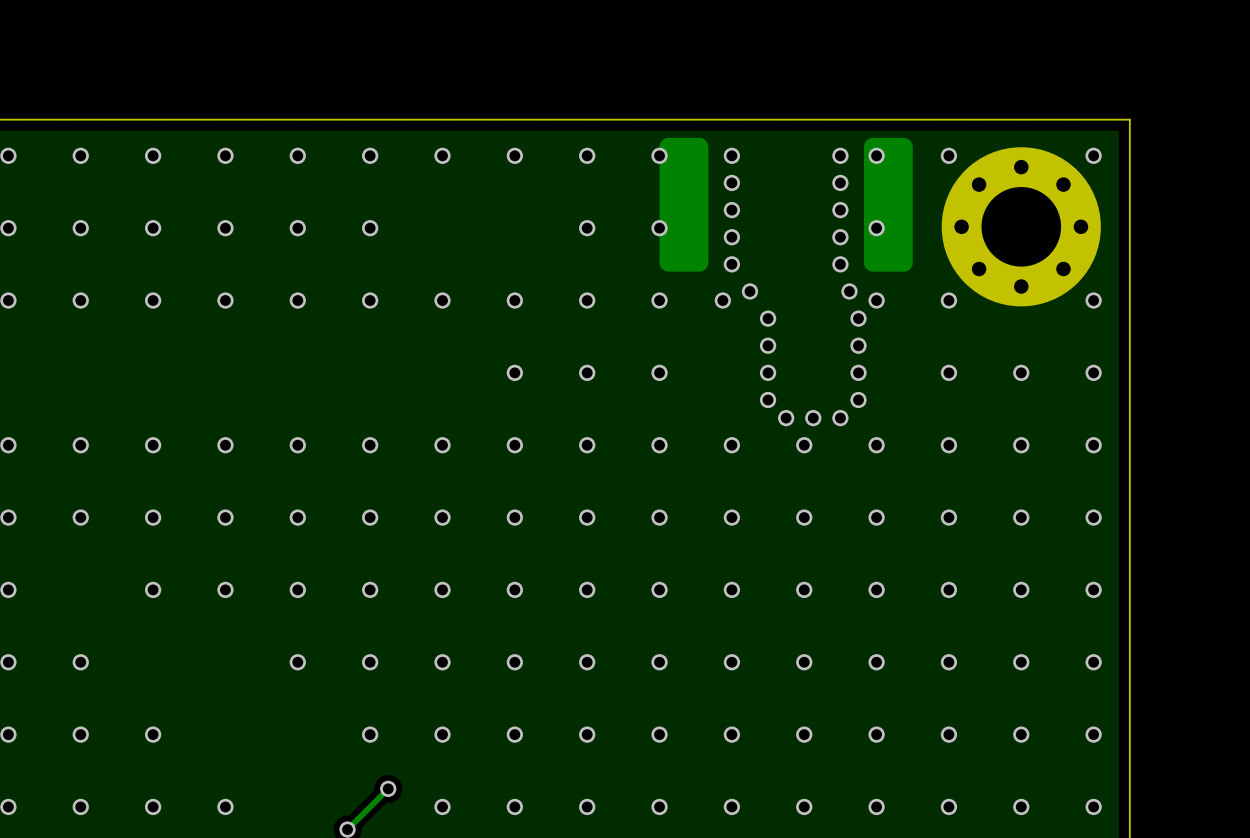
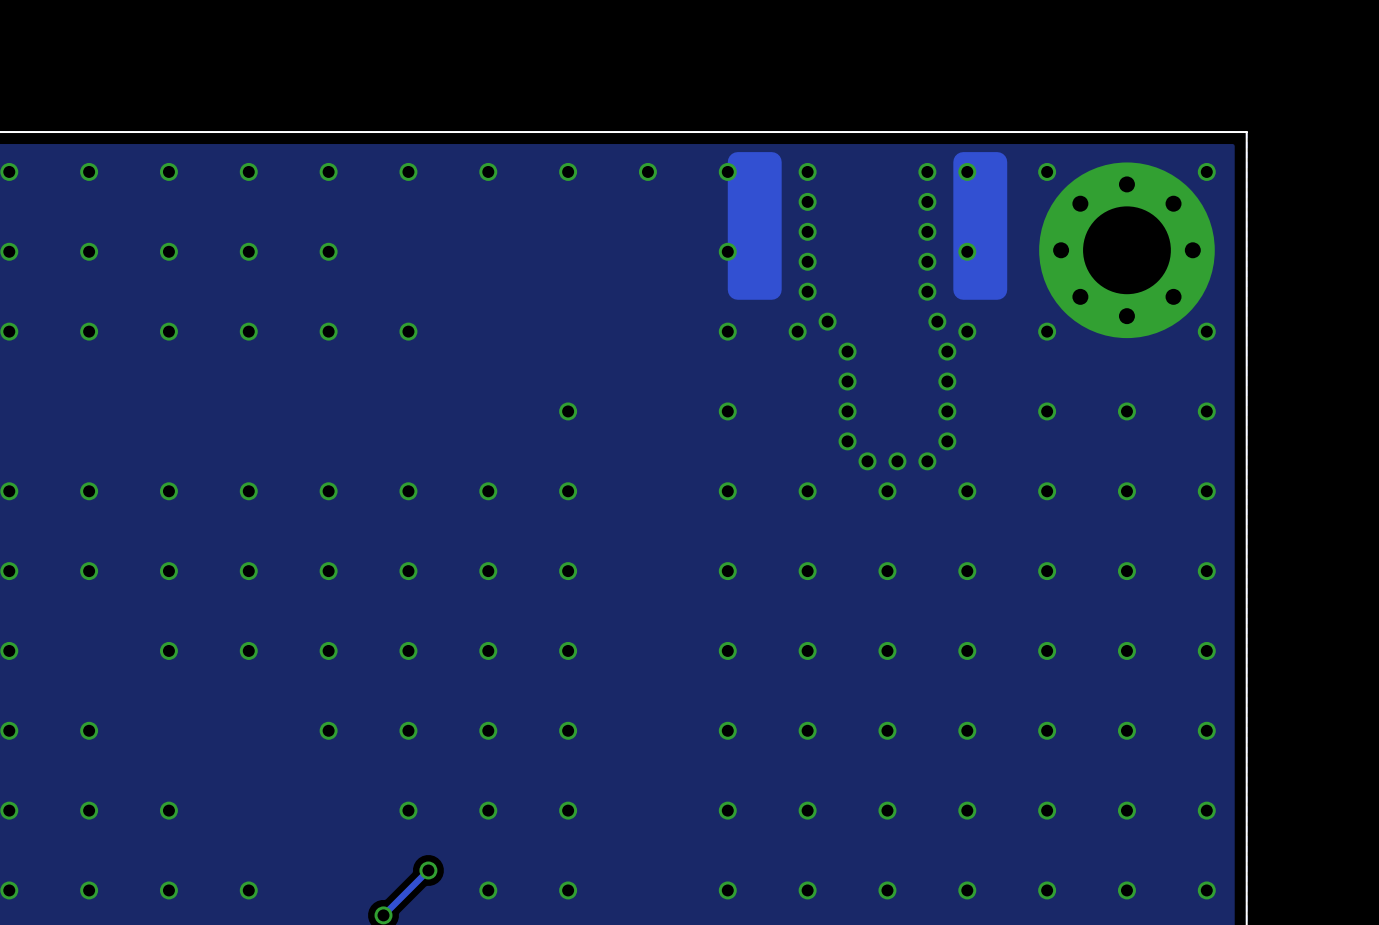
via: (370, 228) -> none
via: (587, 228) -> none
via: (442, 300) -> none
via: (514, 300) -> none
via: (587, 300) -> none
via: (587, 372) -> none
via: (587, 445) -> none
via: (587, 517) -> none
via: (587, 589) -> none
via: (587, 662) -> none
via: (587, 734) -> none
via: (587, 806) -> none

